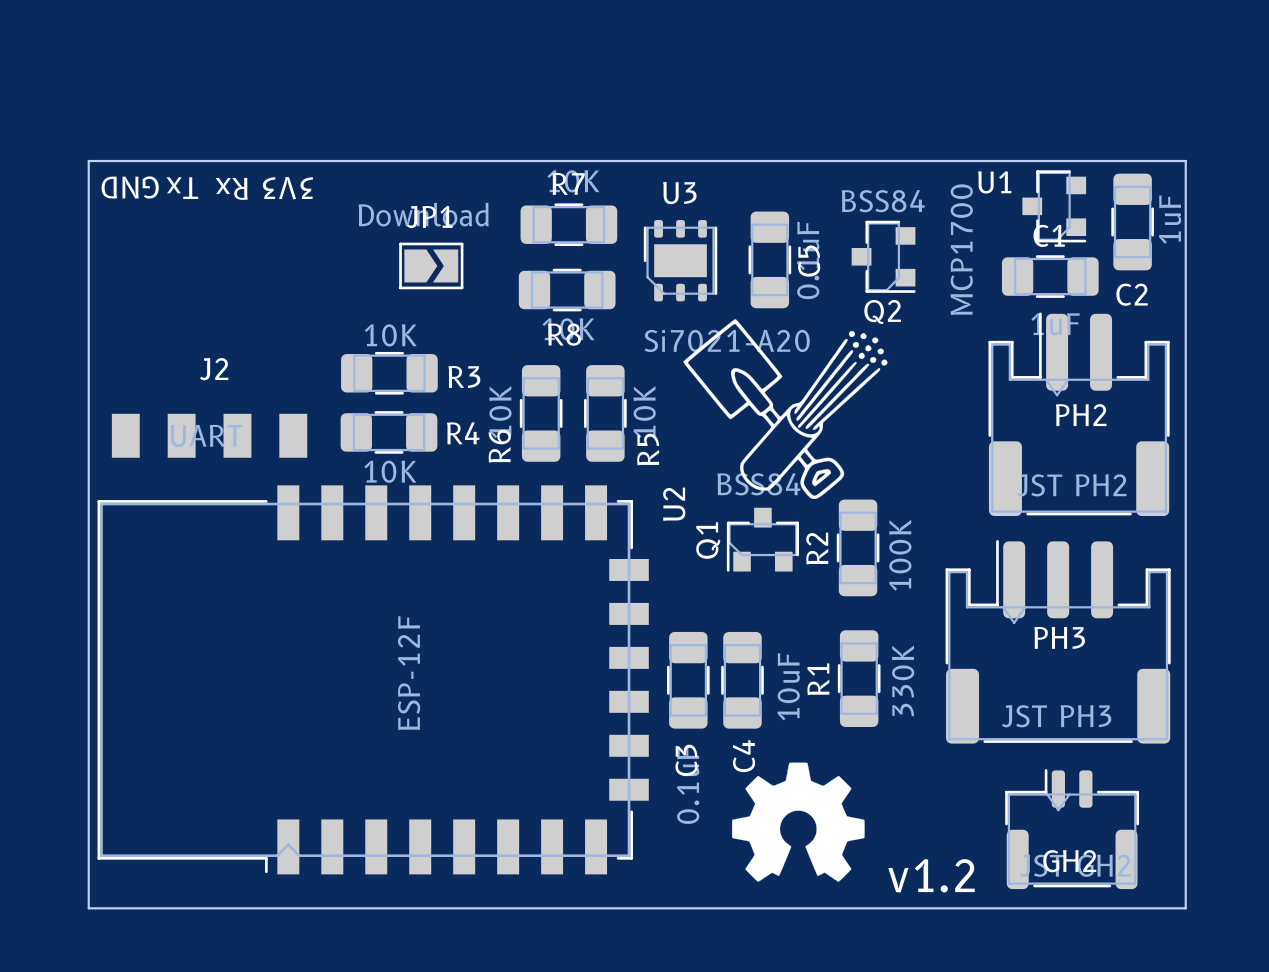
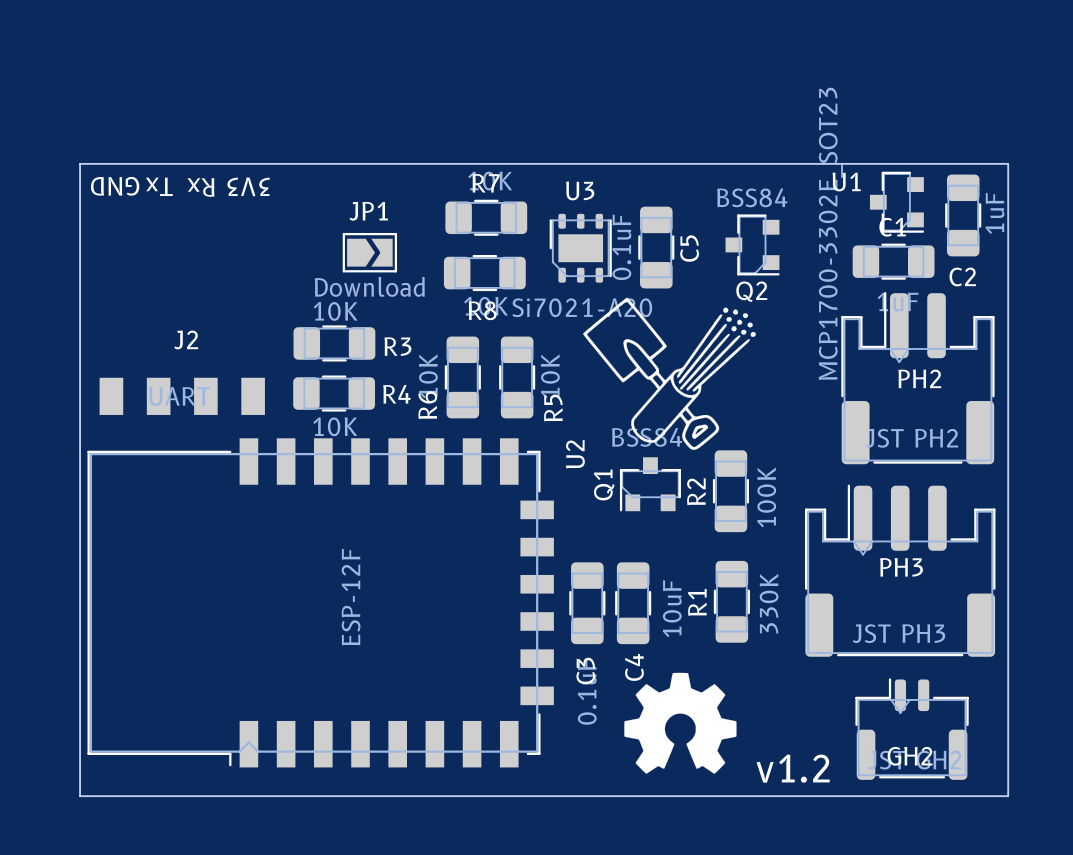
JP1 value position: Download (423, 214) -> Download (369, 286)
U1 value: MCP1700 (961, 249) -> MCP1700-3302E_SOT23 (830, 233)
C5 value position: 0.1uF (808, 260) -> 0.1uF (621, 247)
U3 value position: Si7021-A20 (727, 340) -> Si7021-A20 (582, 307)

